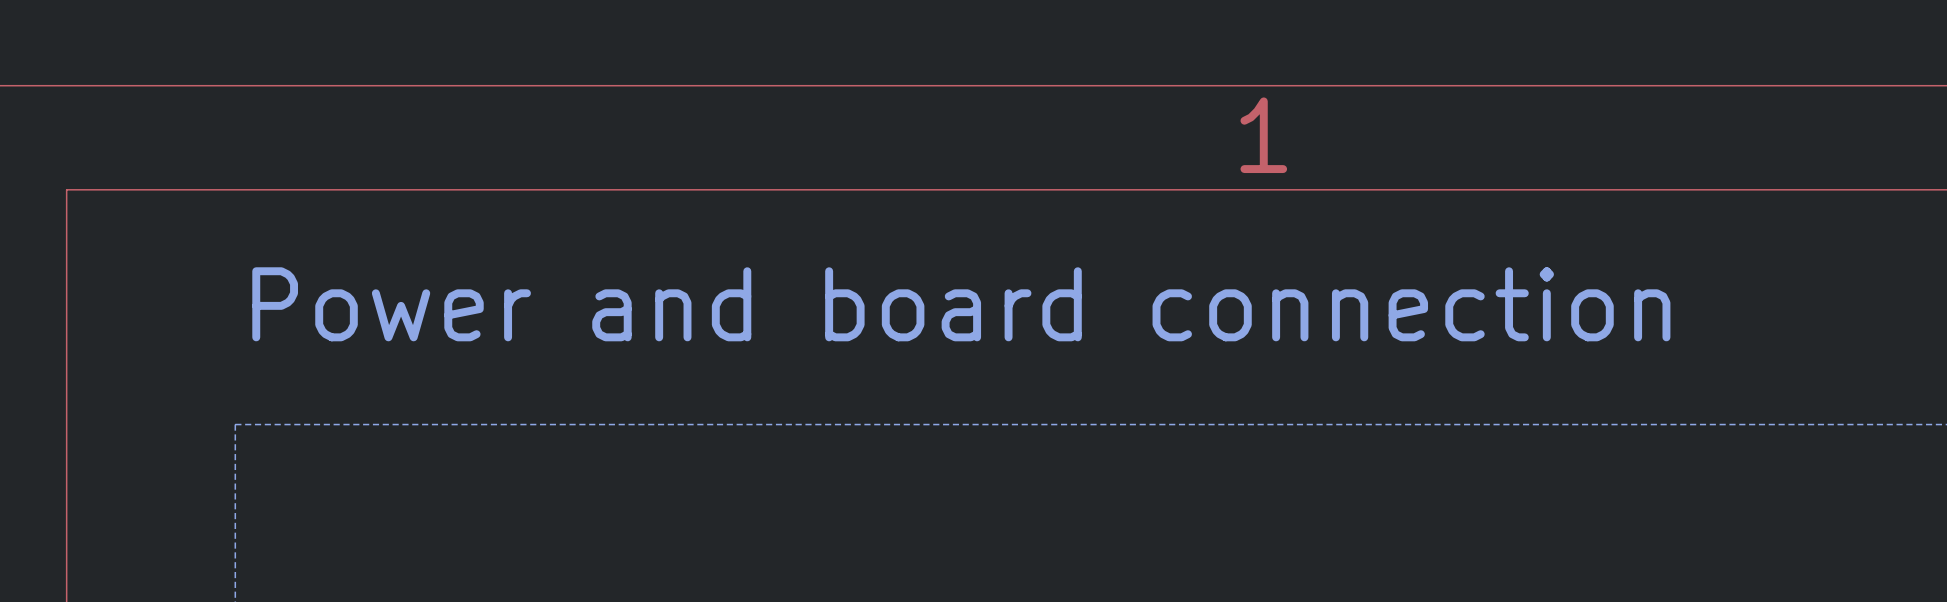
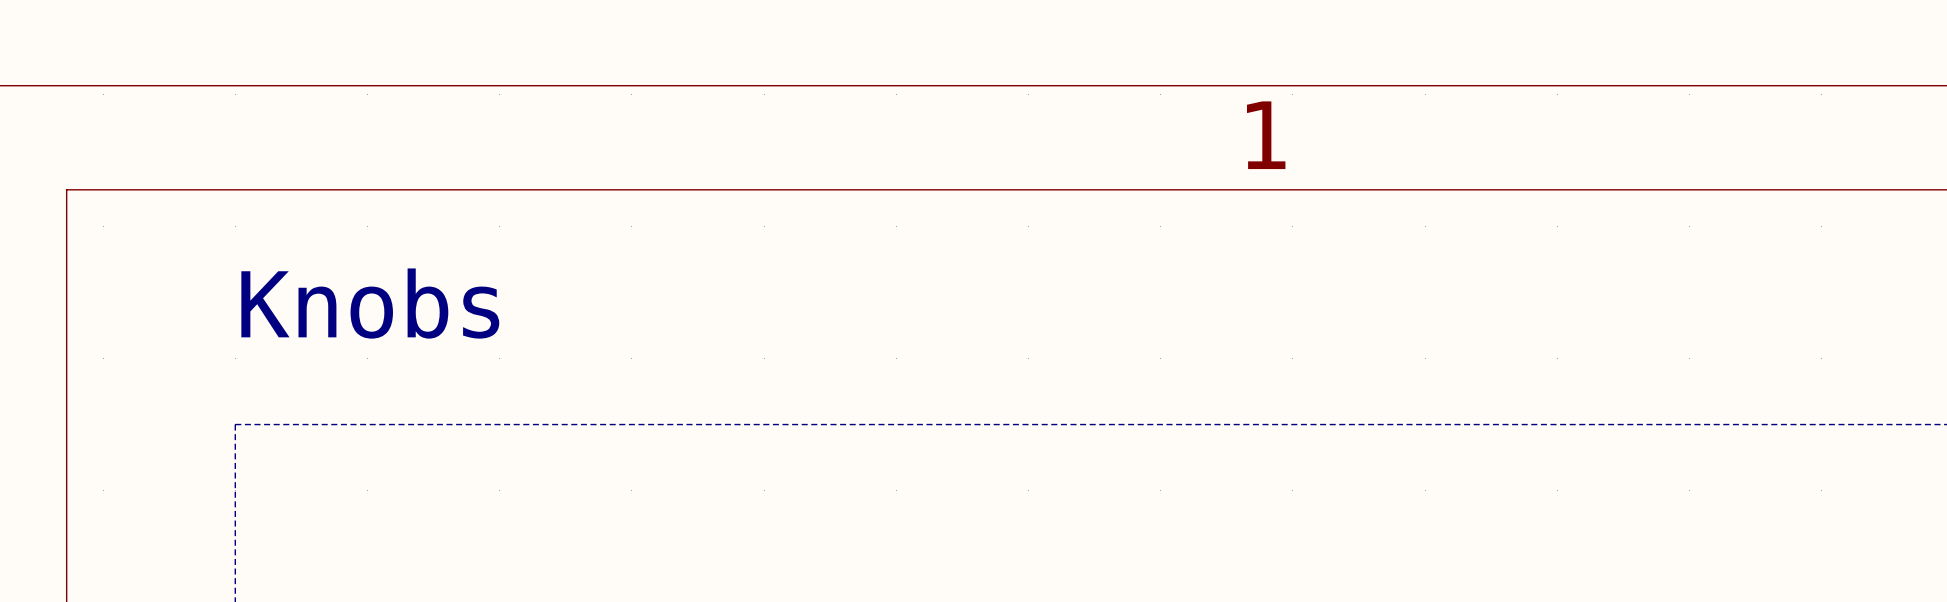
text: Power and board connection (961, 304) -> Knobs (370, 303)

